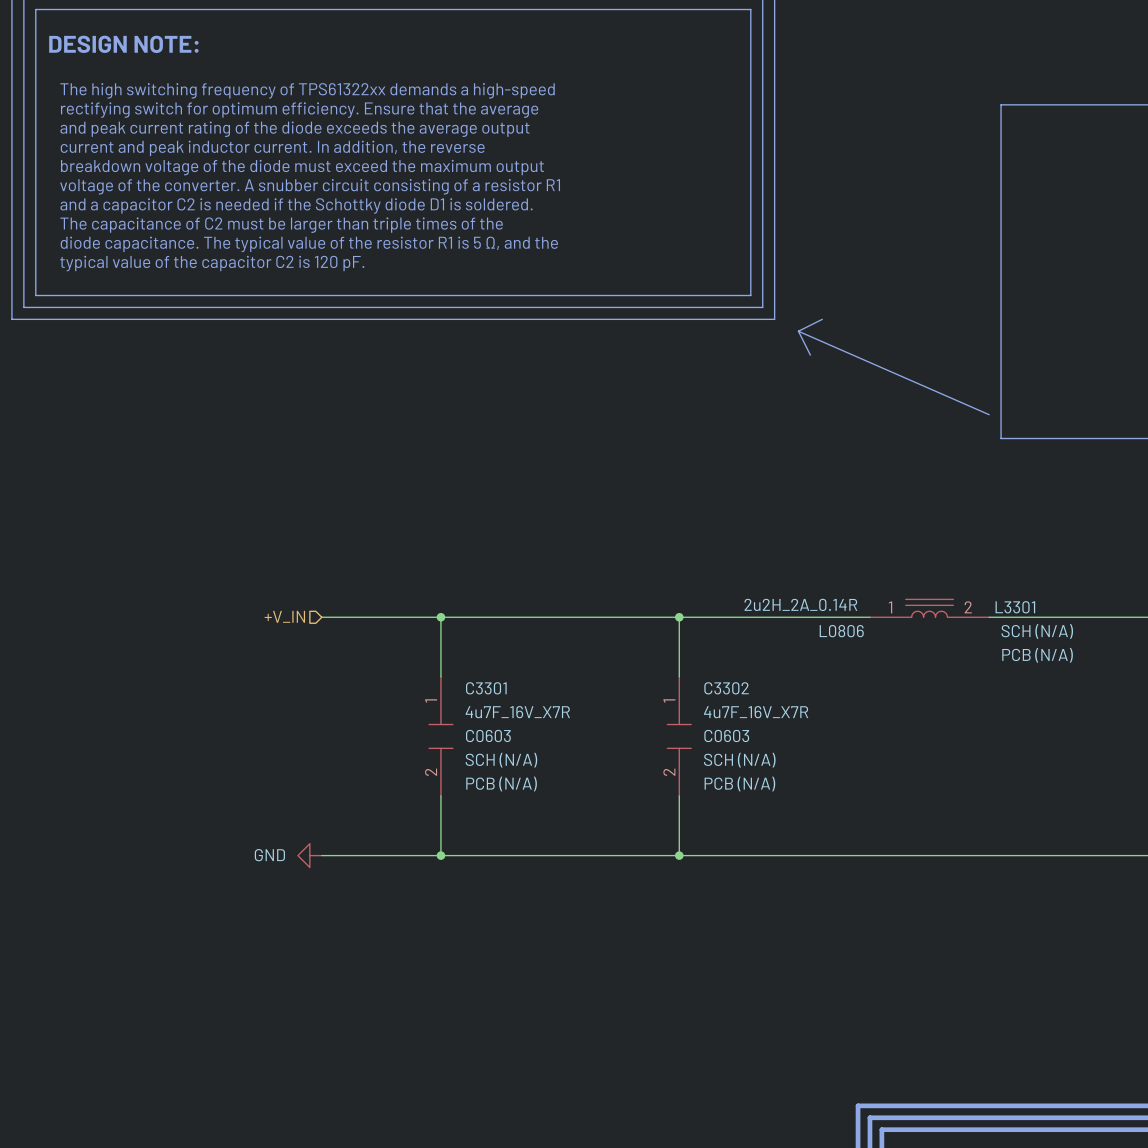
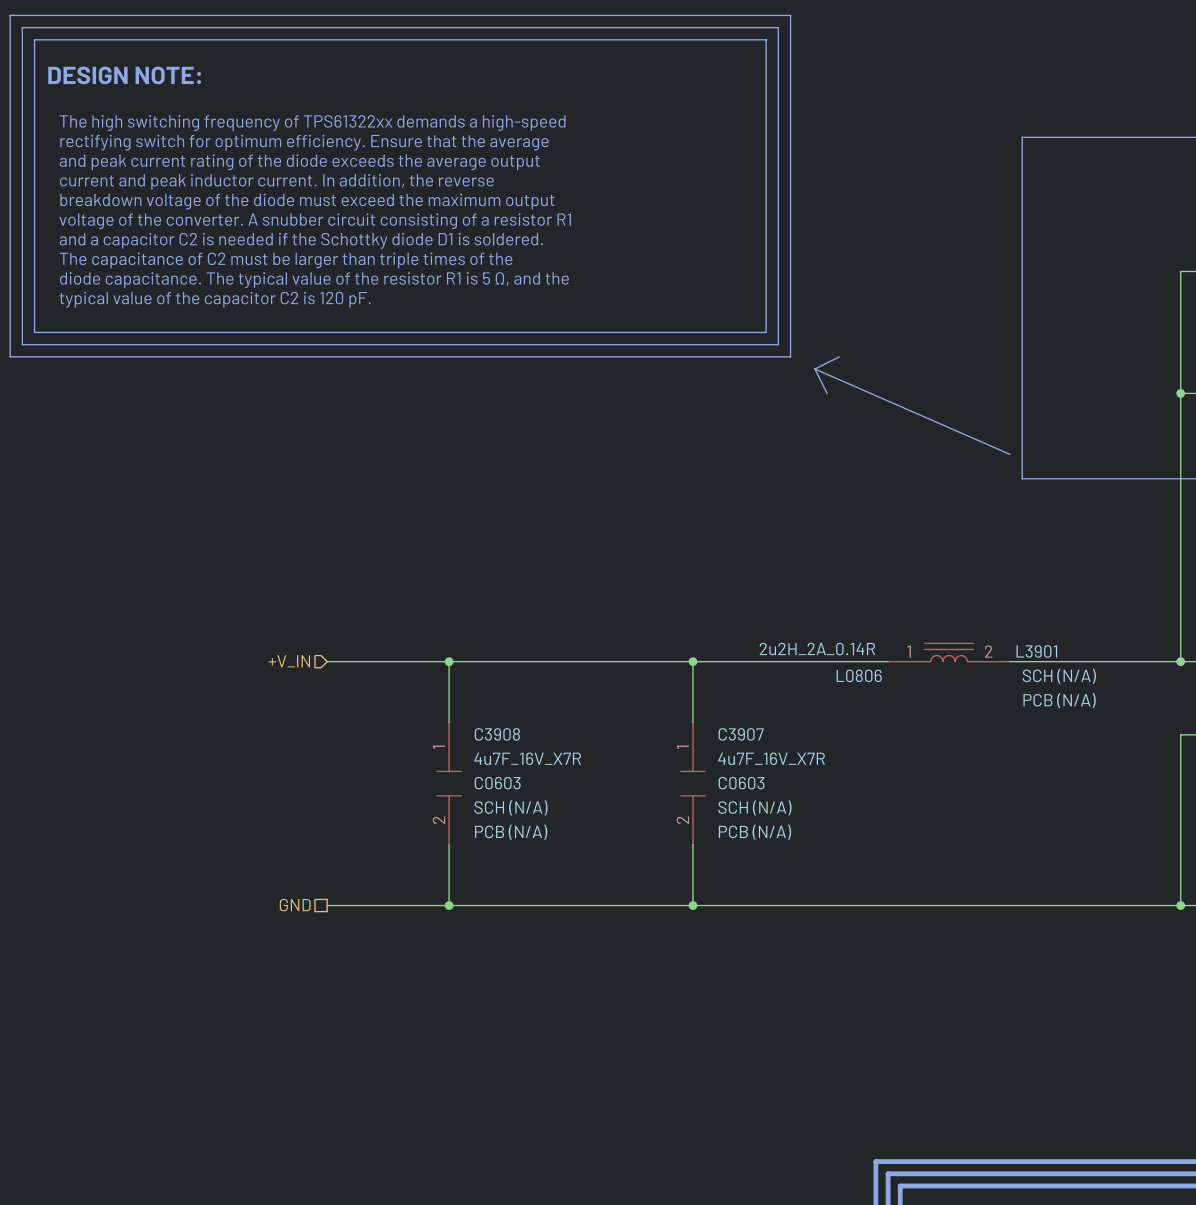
L3301 name: L3301 (1015, 607) -> L3901 (1036, 651)
C3301 name: C3301 (486, 688) -> C3908 (497, 734)
C3302 name: C3302 (726, 688) -> C3907 (741, 734)
hierarchical label: none -> GND (295, 905)
power symbol: GND (309, 855) -> none

